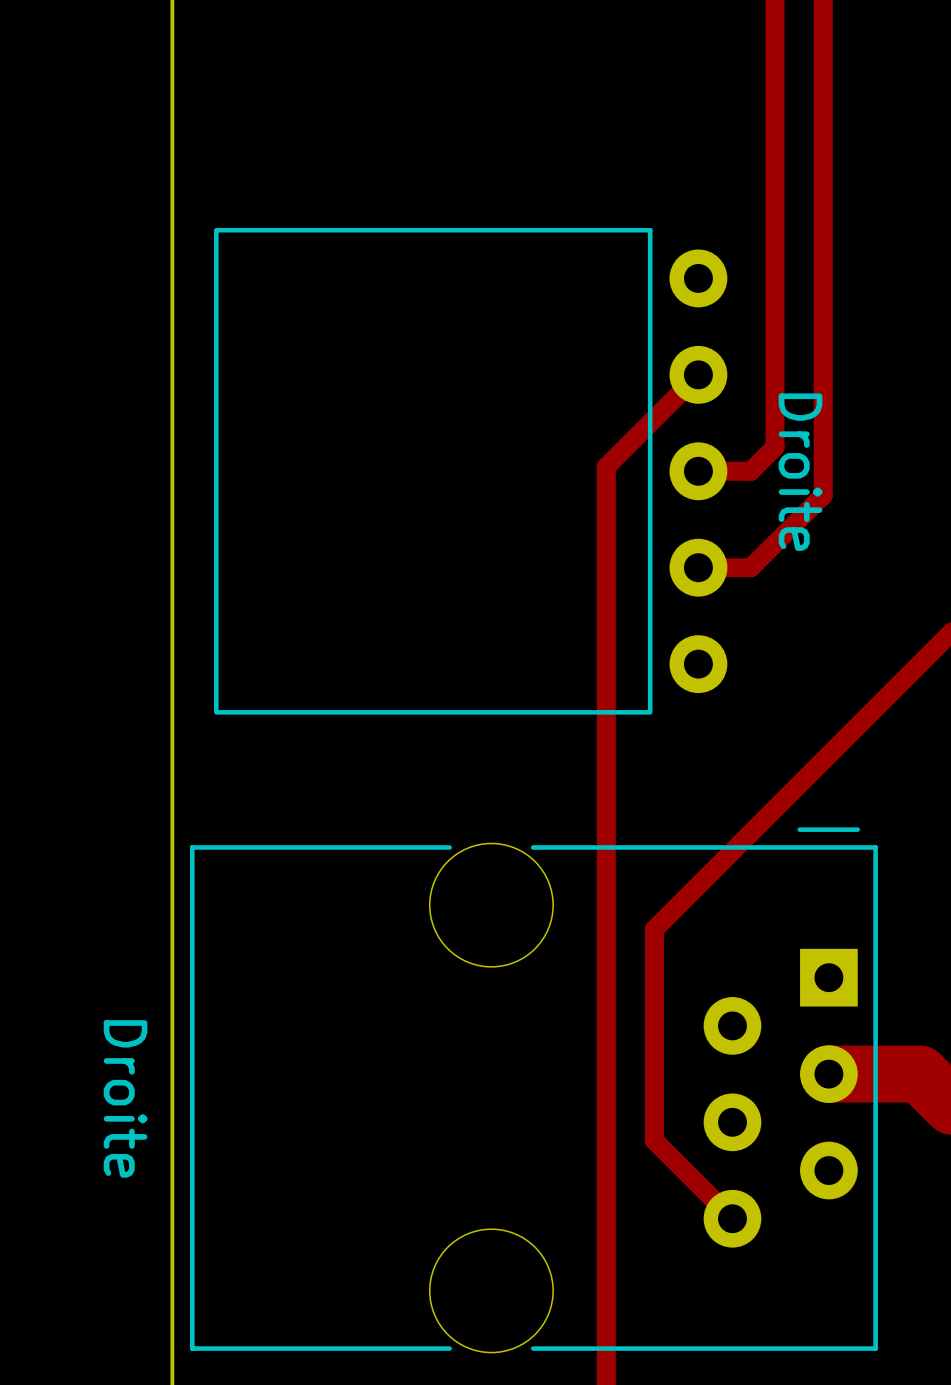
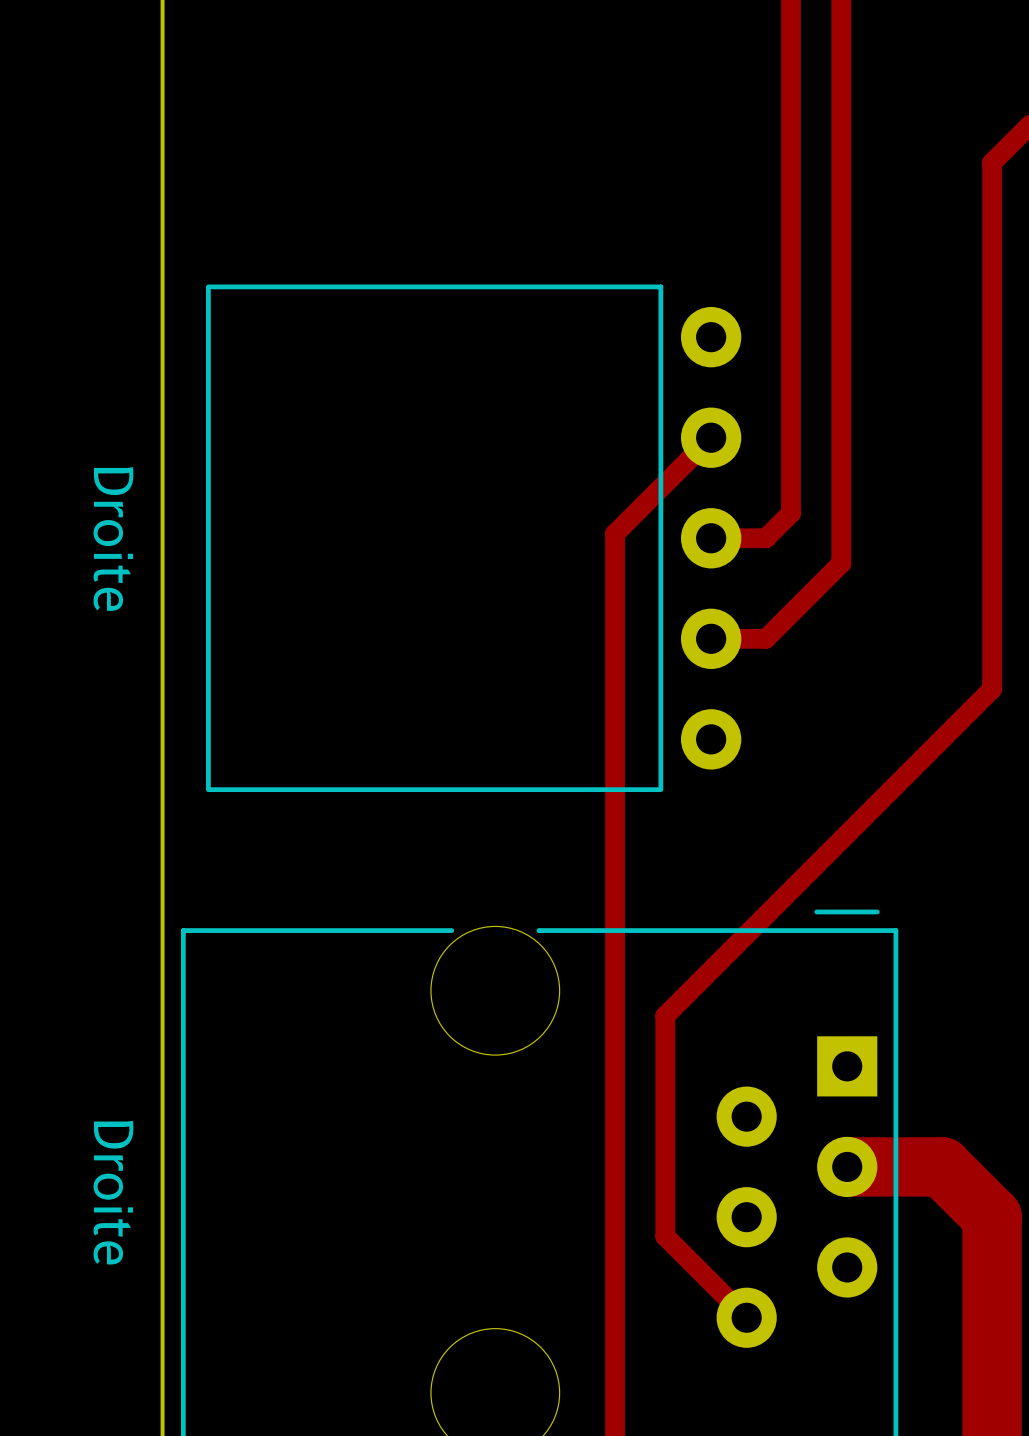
text position: Droite (800, 472) -> Droite (113, 539)

